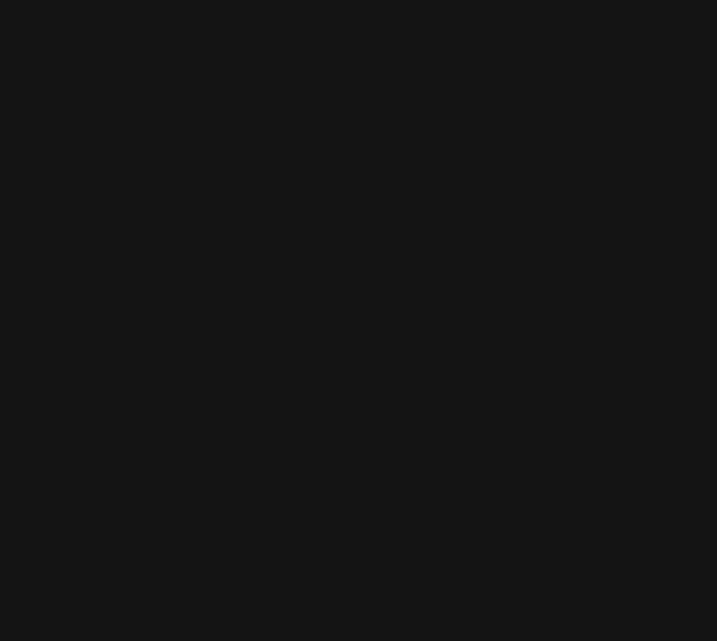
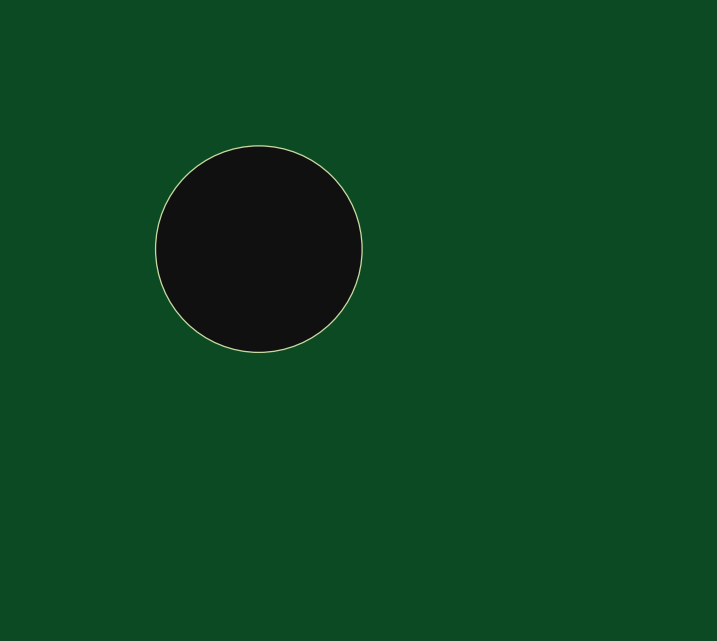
part: none -> (258, 249)

